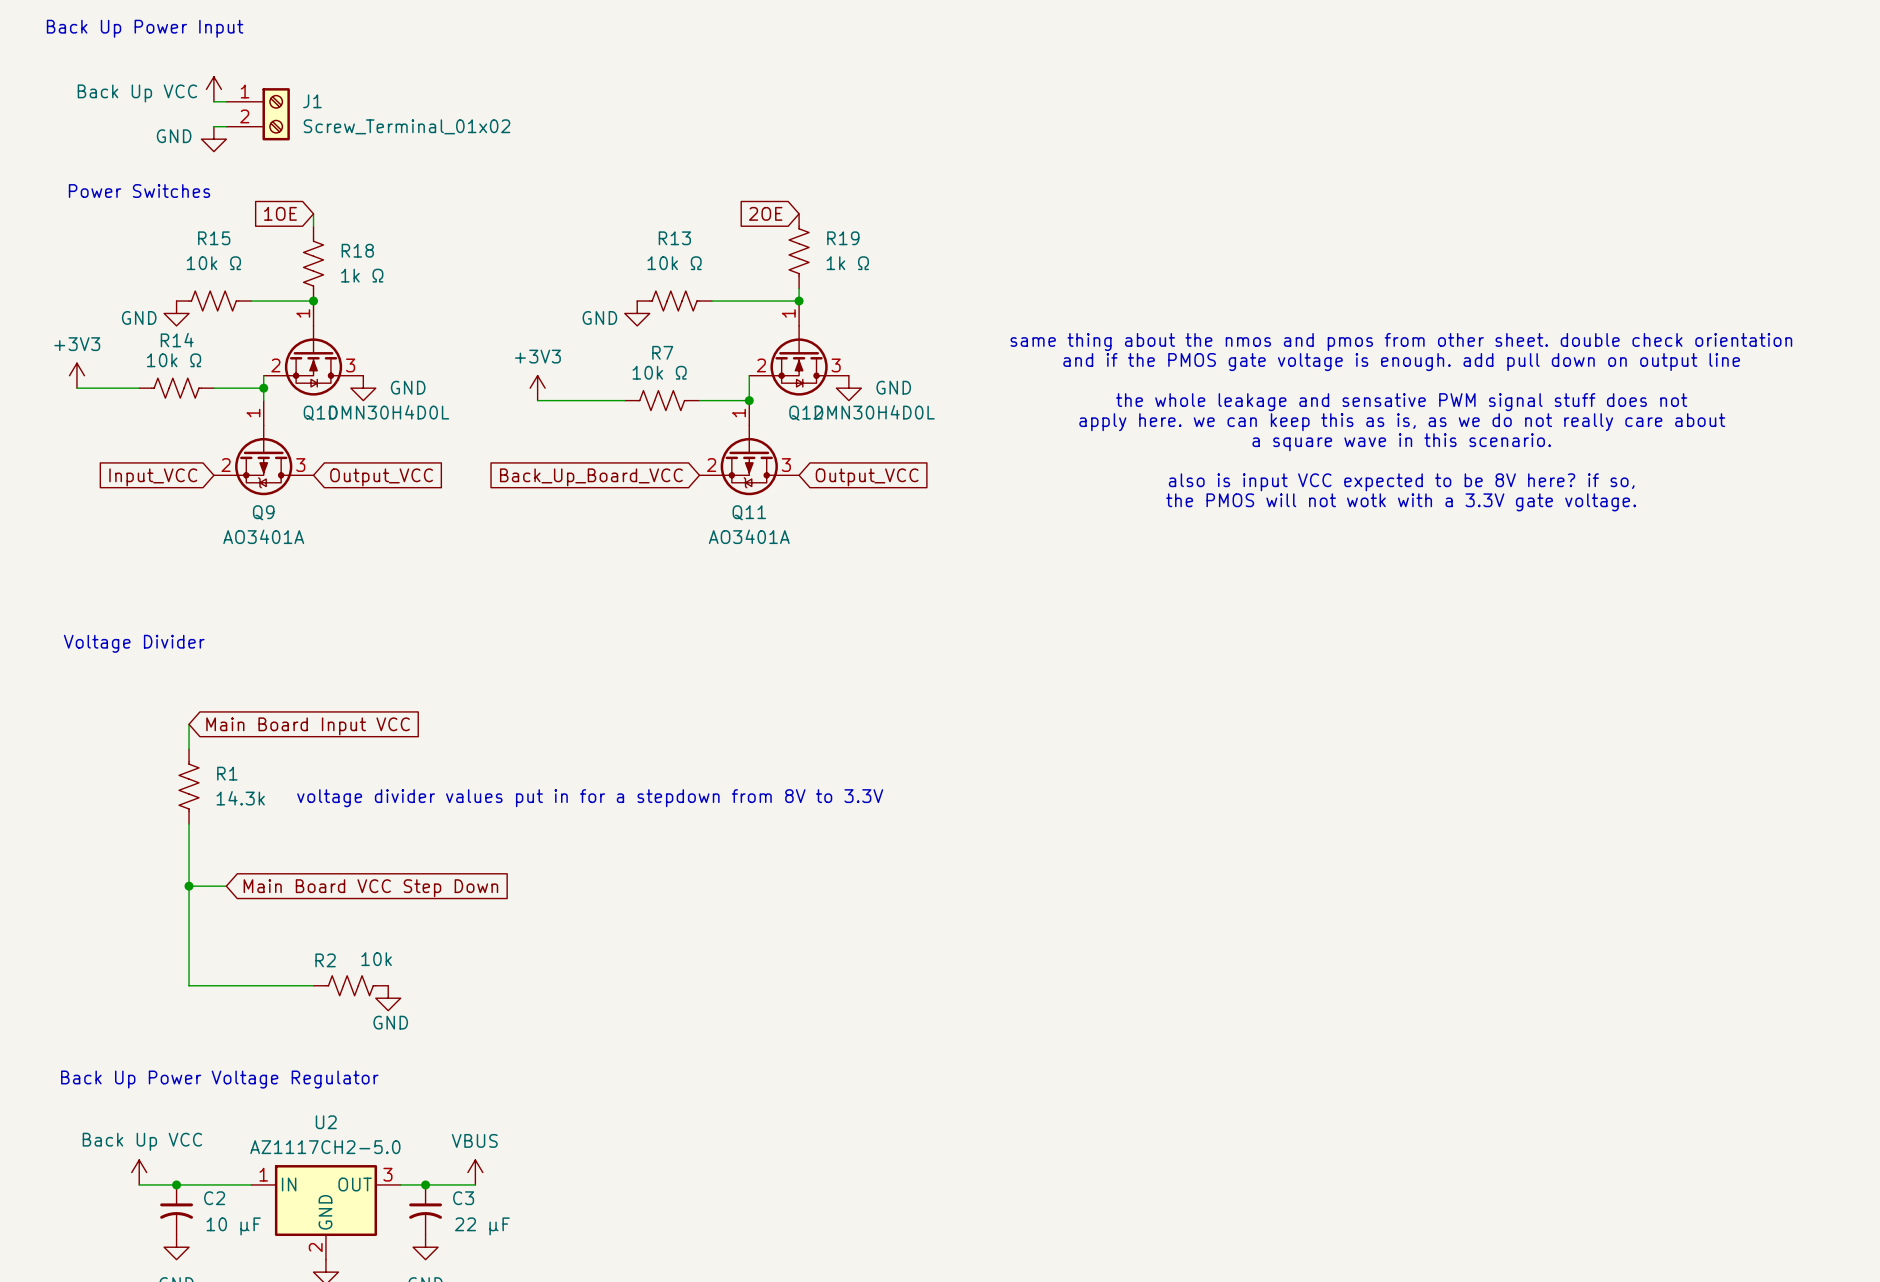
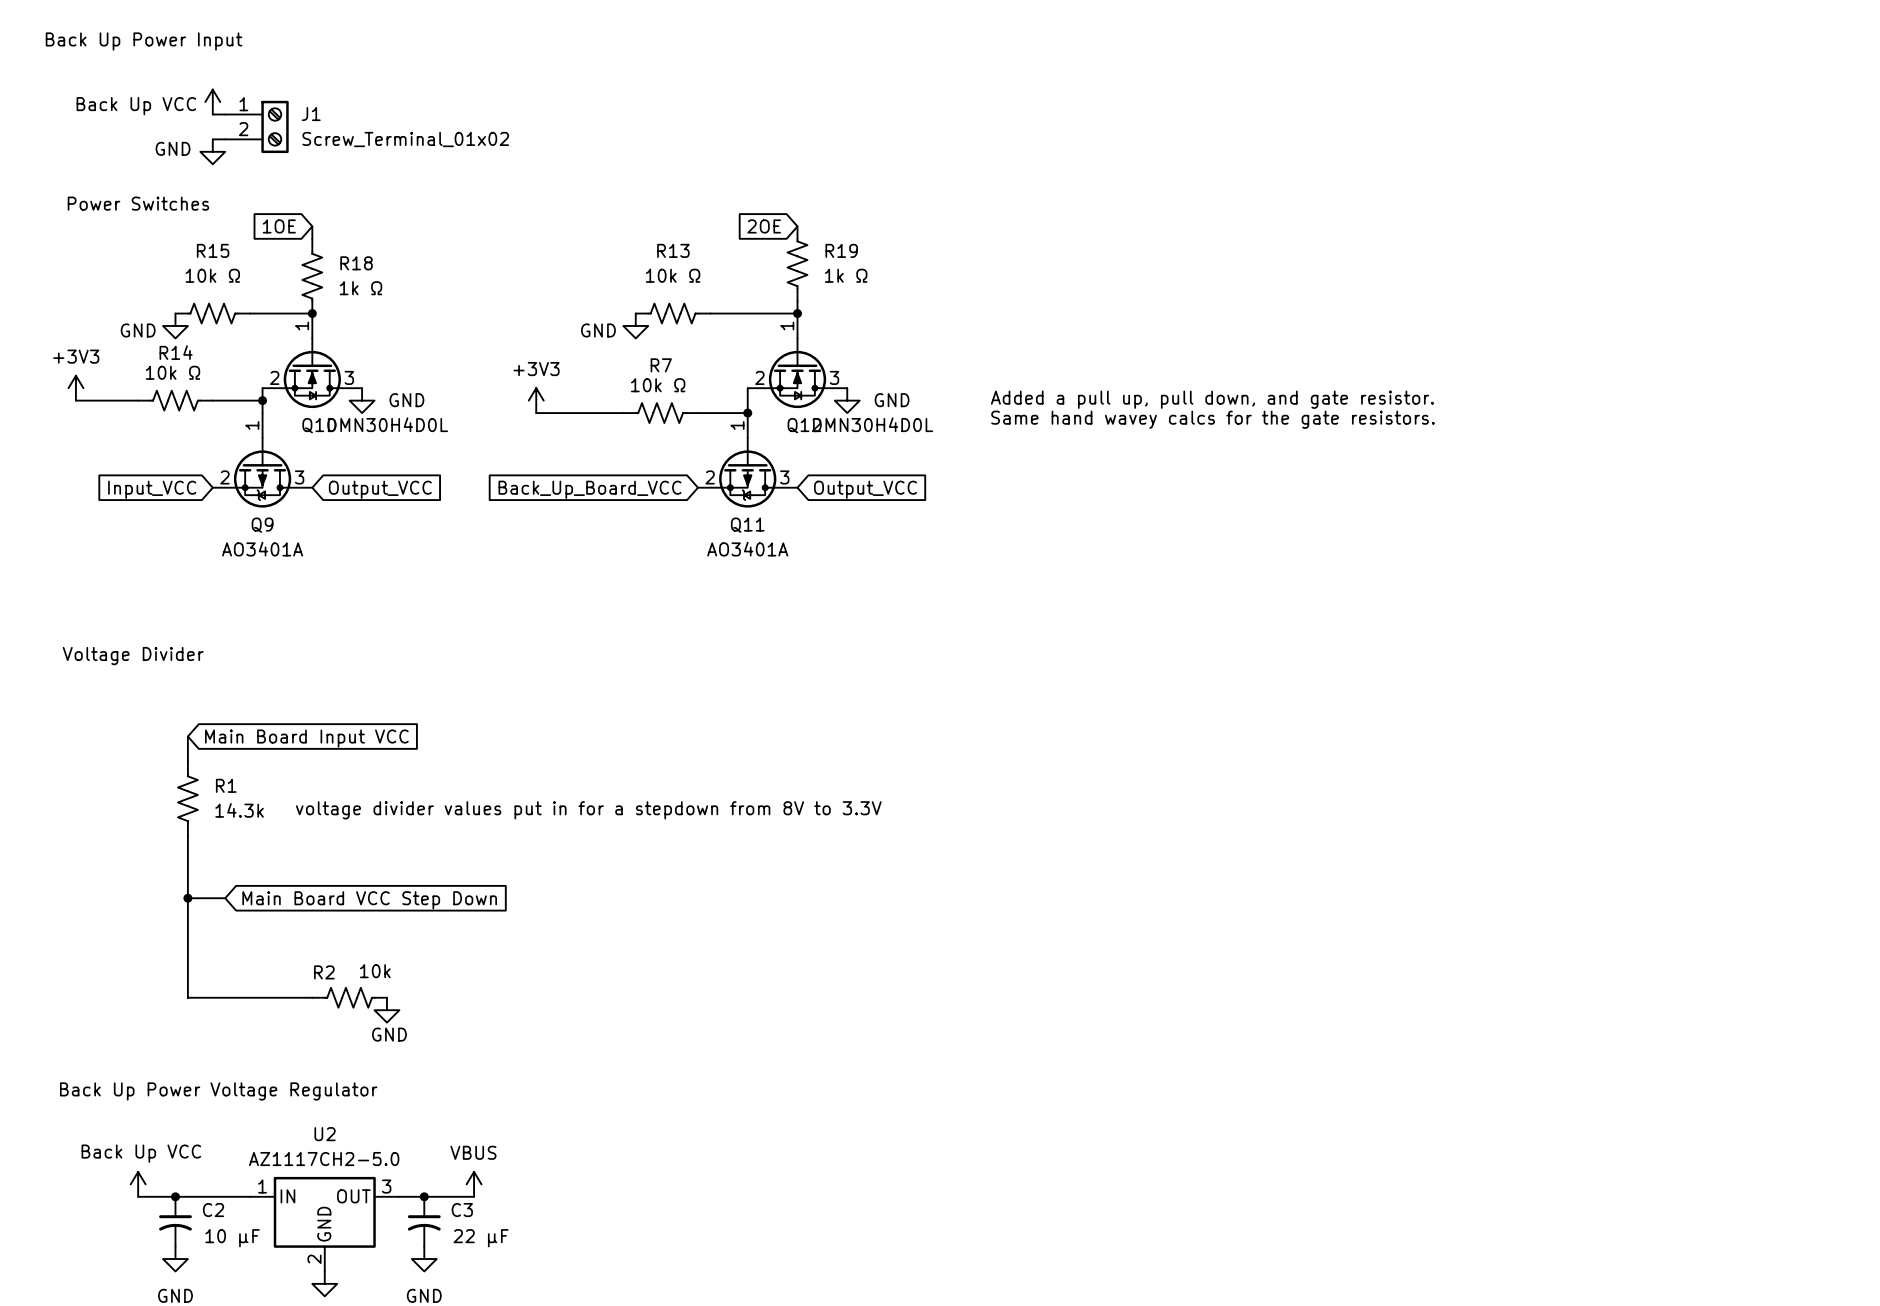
text: same thing about the nmos and pmos from other sheet. double check orientation (1401, 342) -> none
text: and if the PMOS gate voltage is enough. add pull down on output line (1401, 362) -> none
text: none -> Added a pull up, pull down, and gate resistor. (1212, 399)
text: the whole leakage and sensative PWM signal stuff does not (1401, 402) -> none
text: none -> Same hand wavey calcs for the gate resistors. (1213, 419)
text: apply here. we can keep this as is, as we do not really care about (1402, 422) -> none
text: a square wave in this scenario. (1401, 442) -> none
text: also is input VCC expected to be 8V here? if so, (1401, 482) -> none
text: the PMOS will not wotk with a 3.3V gate voltage. (1401, 502) -> none

